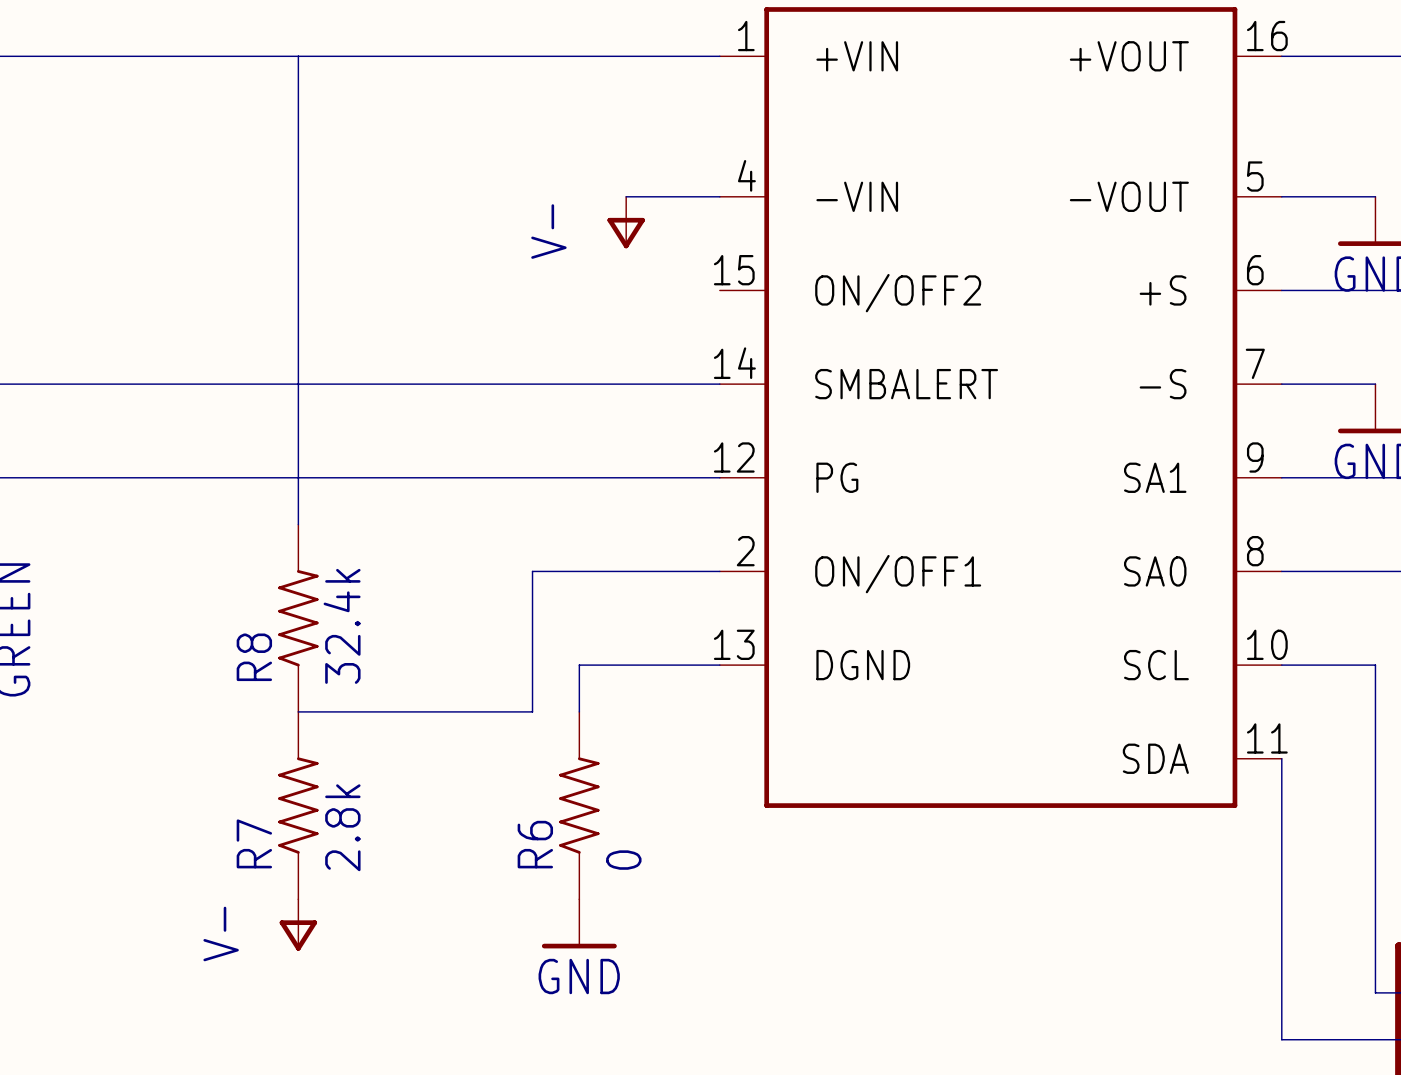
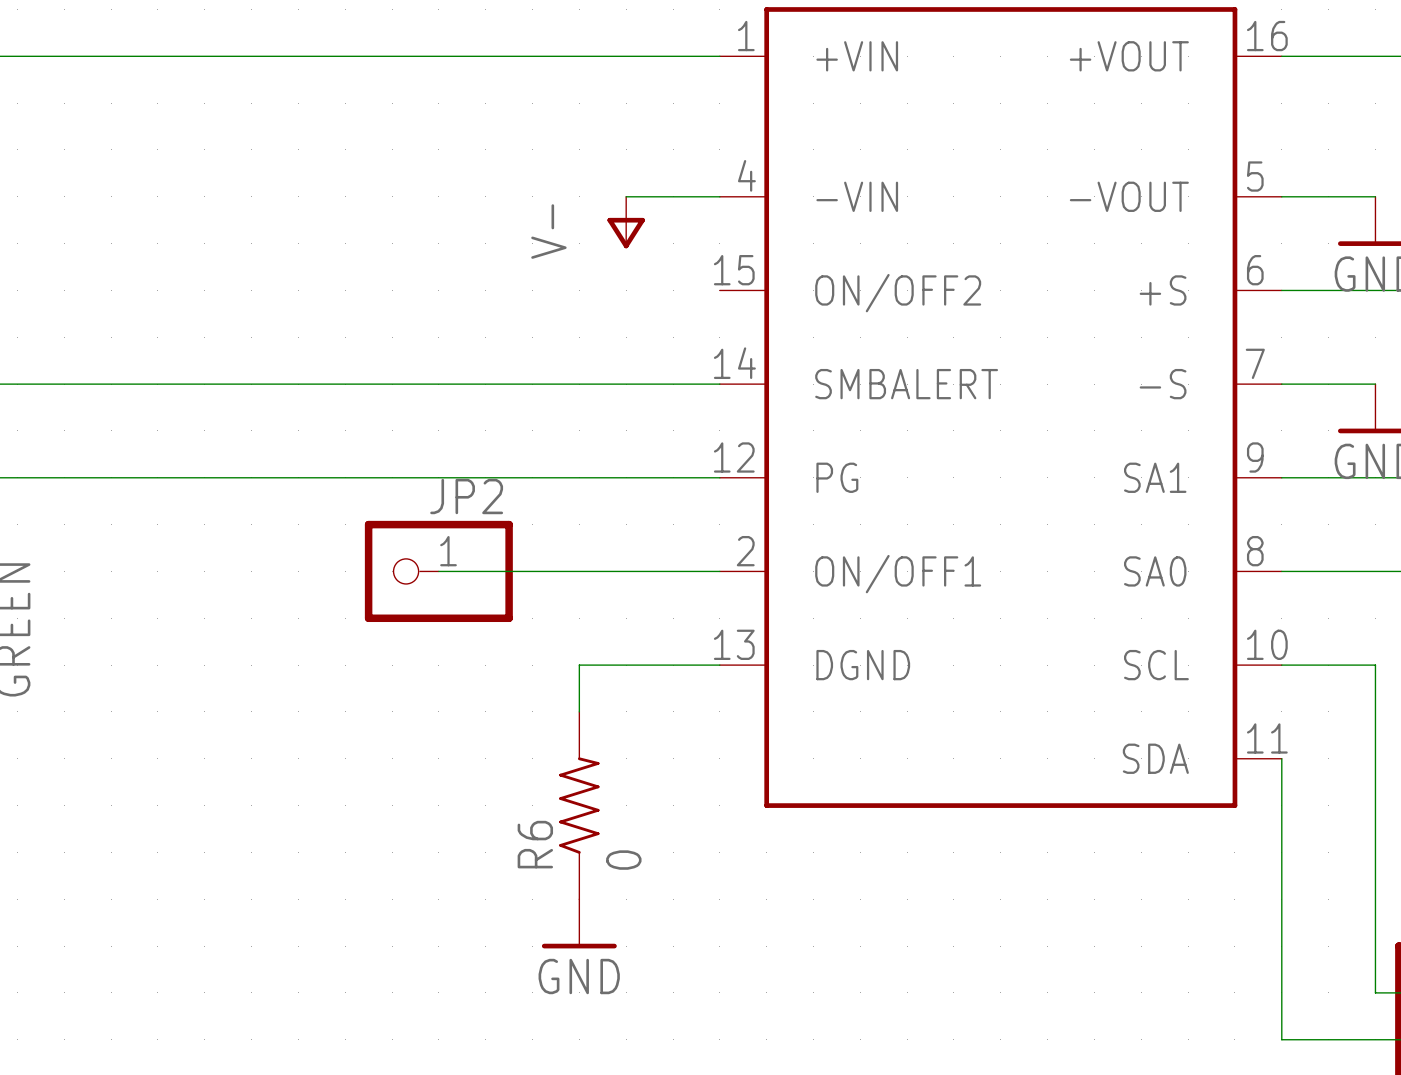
wire: (298, 56) (298, 524) -> none
JP2: none -> (438, 571)
wire: (532, 571) (532, 711) (298, 711) -> (532, 571) (438, 571)
R8: 32.4k (298, 618) -> none
R7: 2.8k (298, 805) -> none
power symbol: V- (298, 925) -> none

